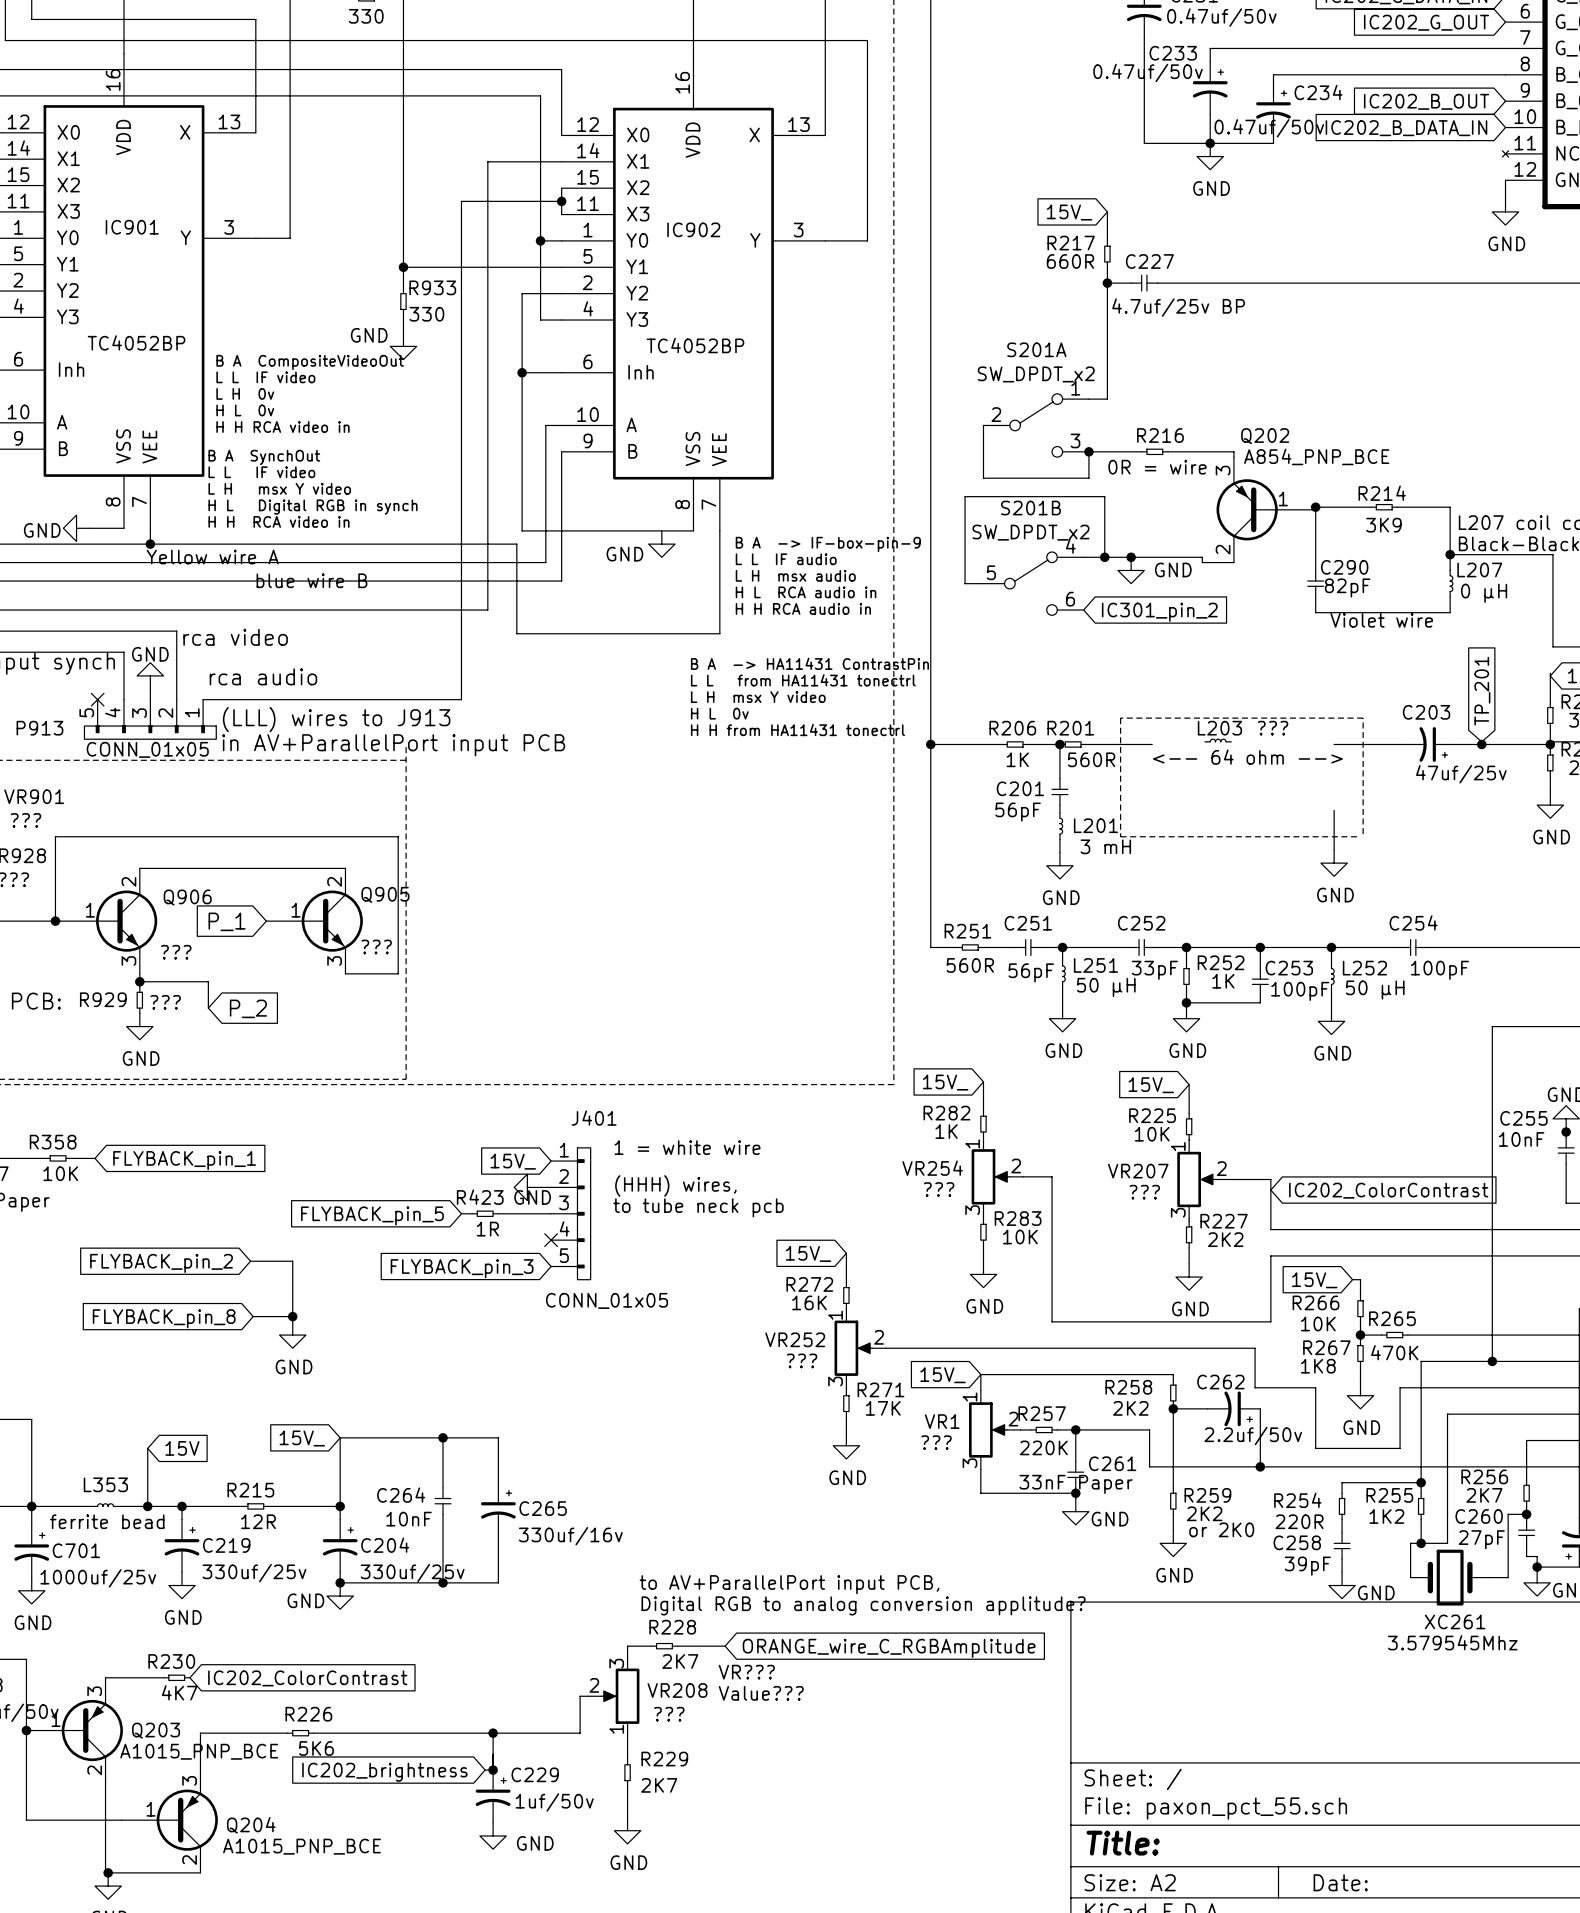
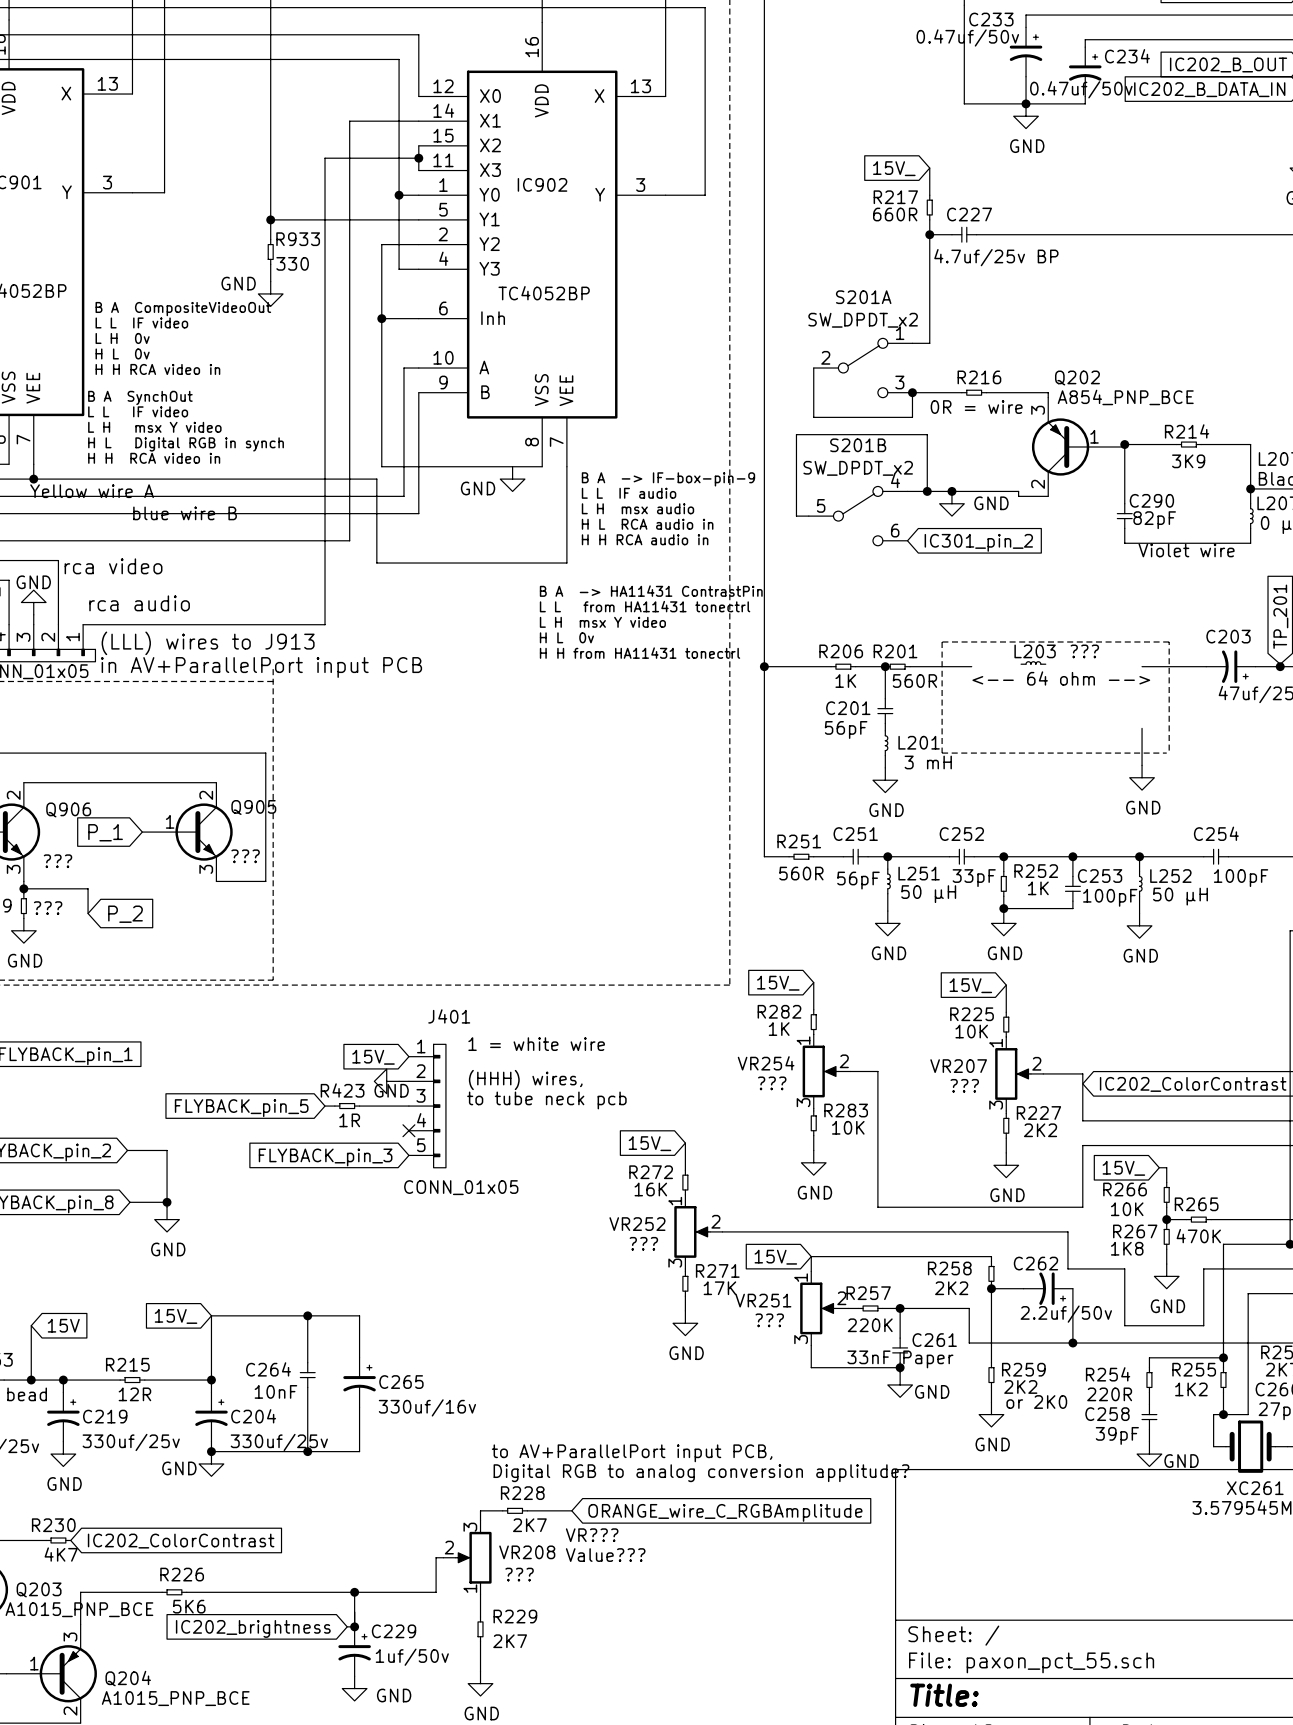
VR1 name: VR1 (942, 1421) -> VR251 (763, 1300)

